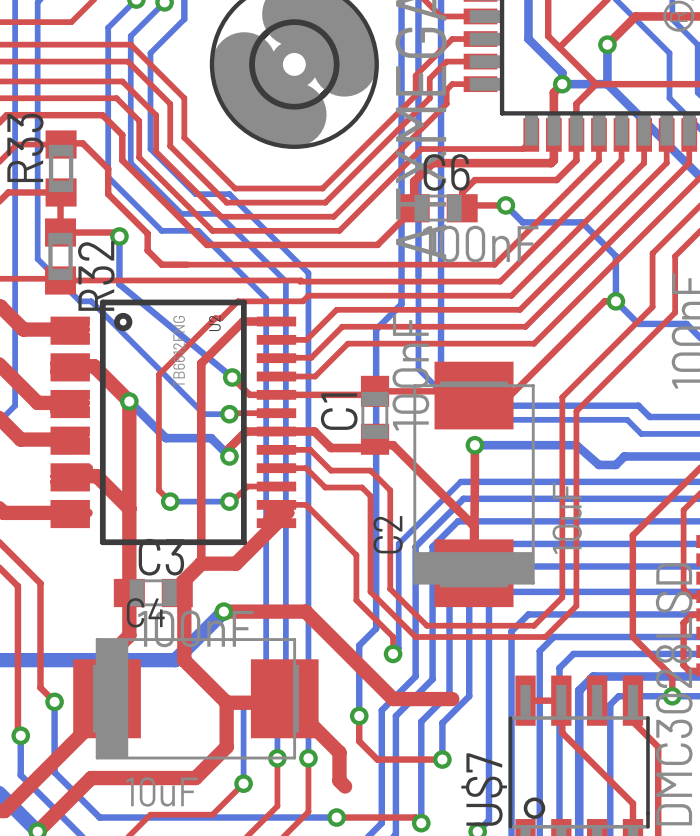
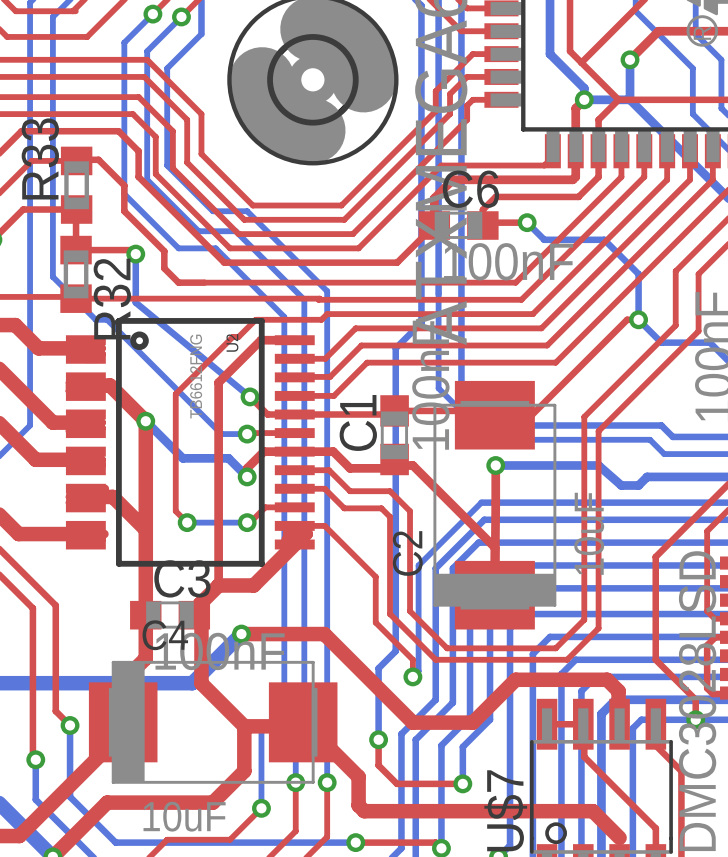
top track: none -> (472, 722) (515, 679) (607, 679) (618, 691) (618, 723)
top track: none -> (364, 811) (592, 811) (619, 837)

